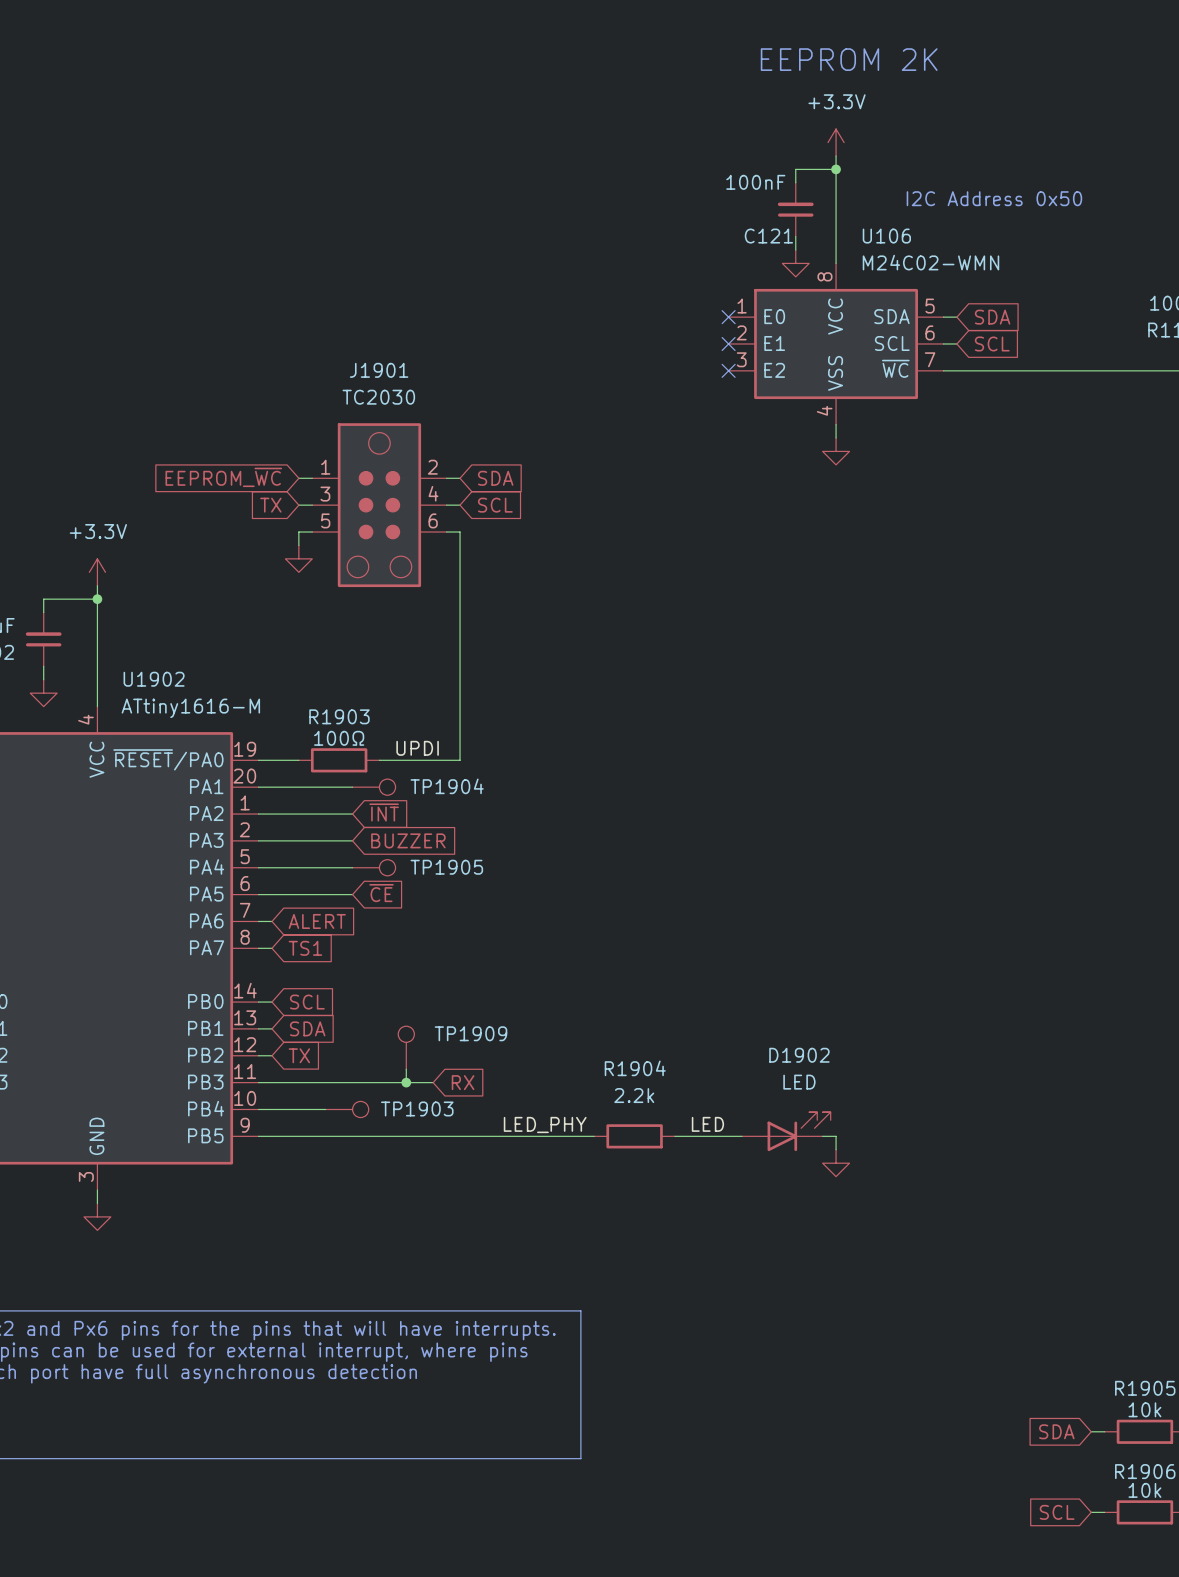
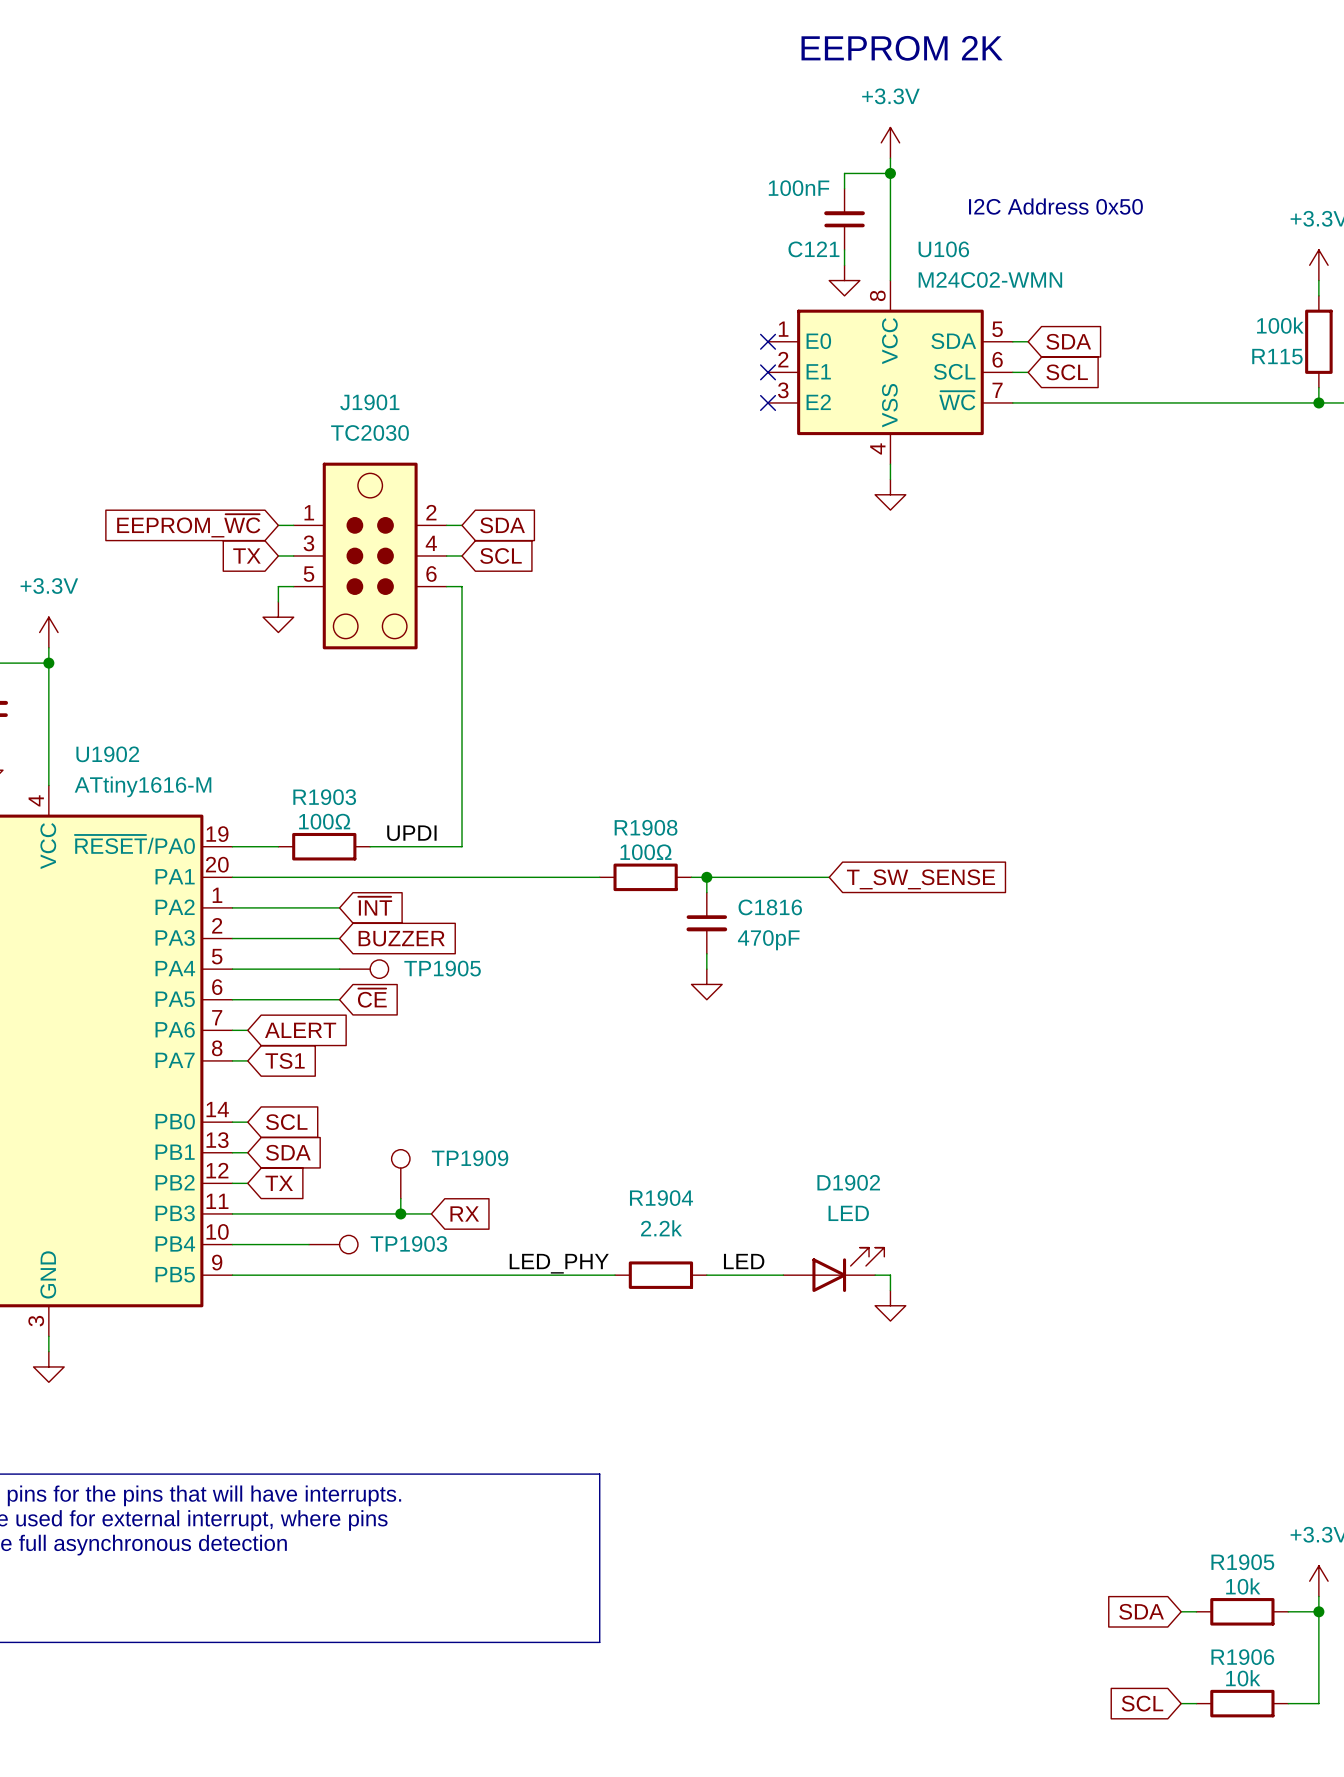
wire: none -> (339, 877) (599, 877)
TP1904: (374, 787) -> none
R1908: none -> 100Ω (645, 877)
wire: none -> (691, 877) (829, 877)
wire: none -> (706, 877) (706, 892)
junction: none -> (706, 877)
global label: none -> T_SW_SENSE (921, 879)
C1816: none -> 470pF (706, 923)
wire: none -> (706, 953) (706, 969)
power symbol: none -> (706, 984)

